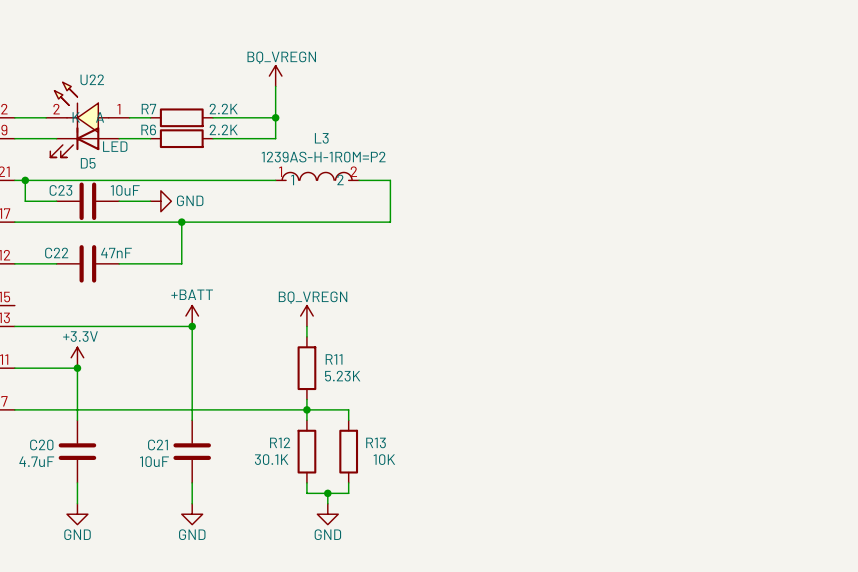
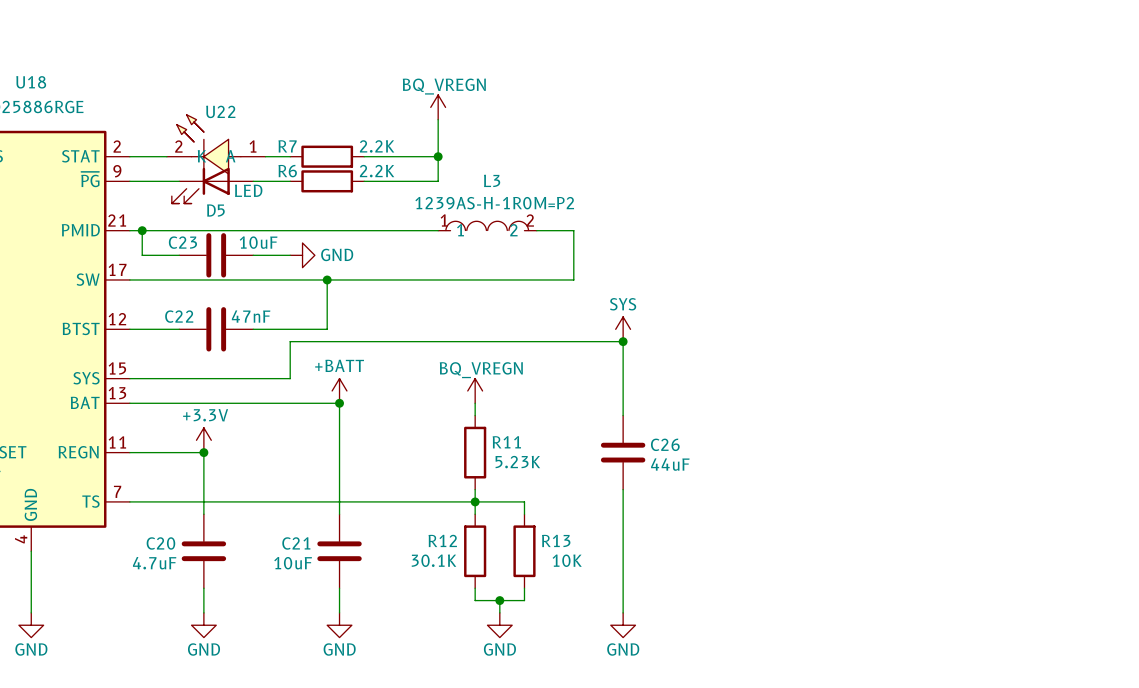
power symbol: none -> SYS (623, 329)
junction: none -> (623, 341)
wire: none -> (129, 378) (290, 378) (290, 341) (623, 341) (623, 415)
C26: none -> 44uF (623, 452)
wire: none -> (623, 489) (623, 612)
power symbol: none -> GND (623, 625)

